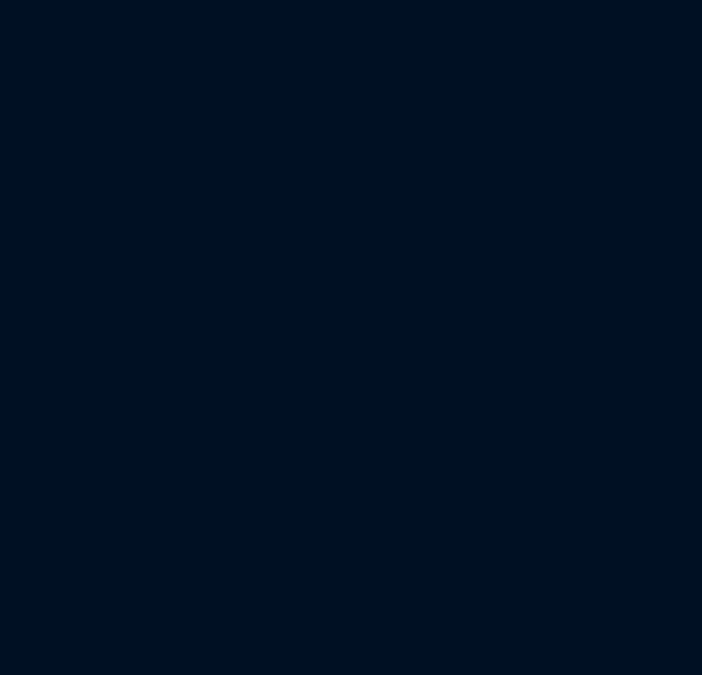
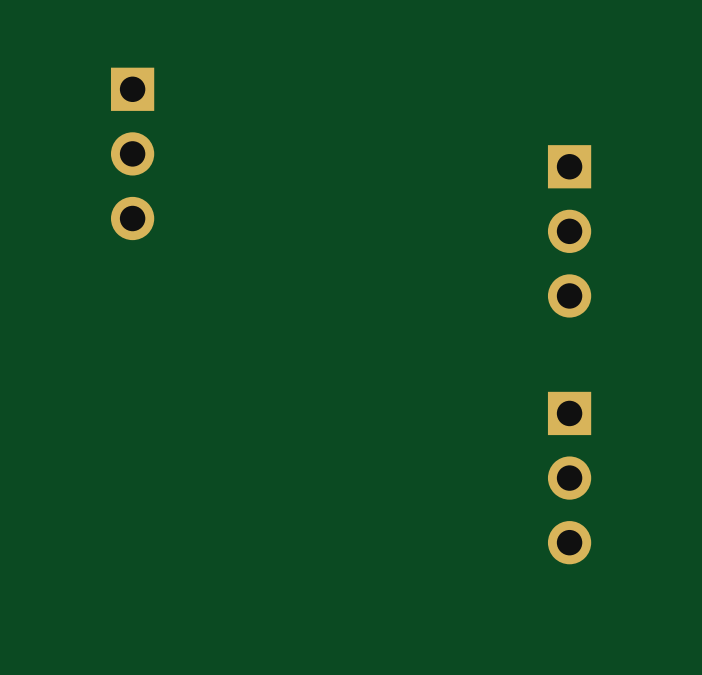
part: none -> (132, 153)
part: none -> (569, 231)
part: none -> (569, 478)

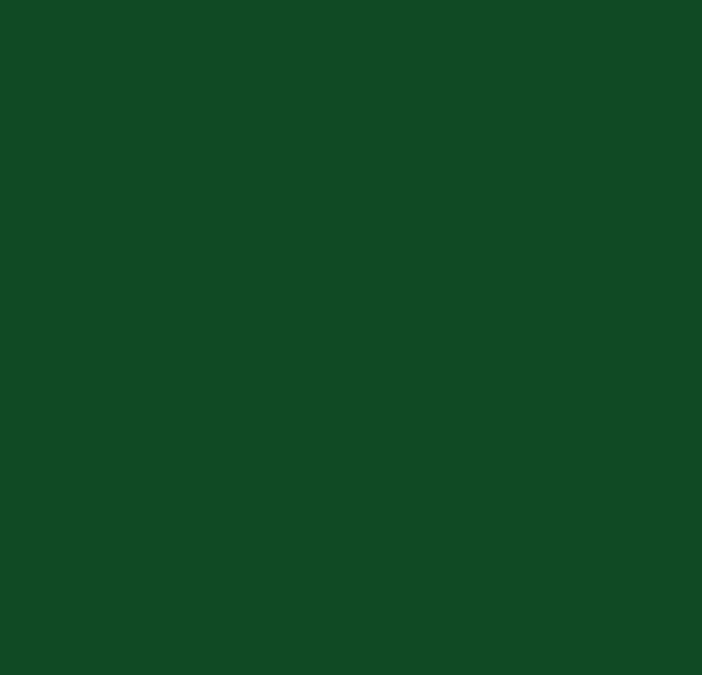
part: (132, 153) -> none
part: (569, 231) -> none
part: (569, 478) -> none

